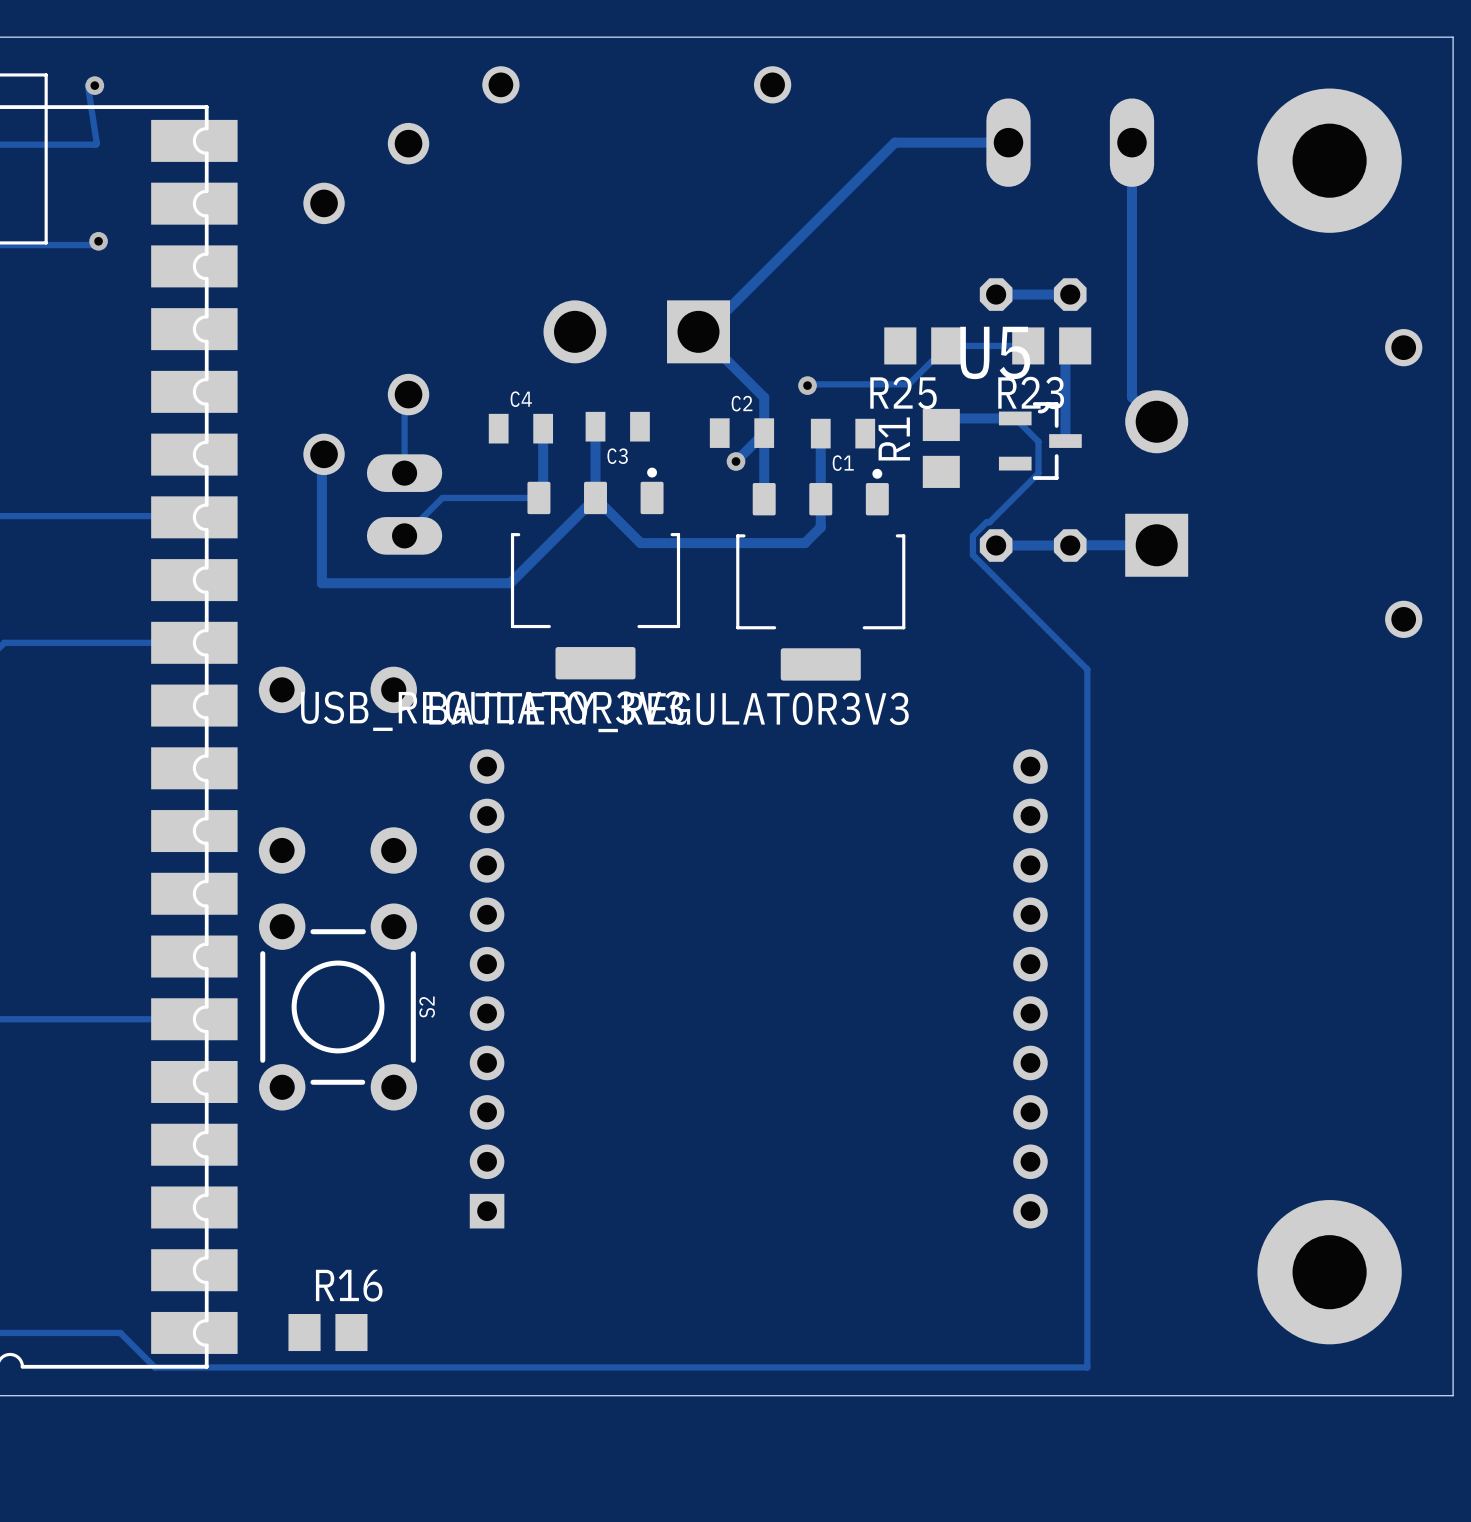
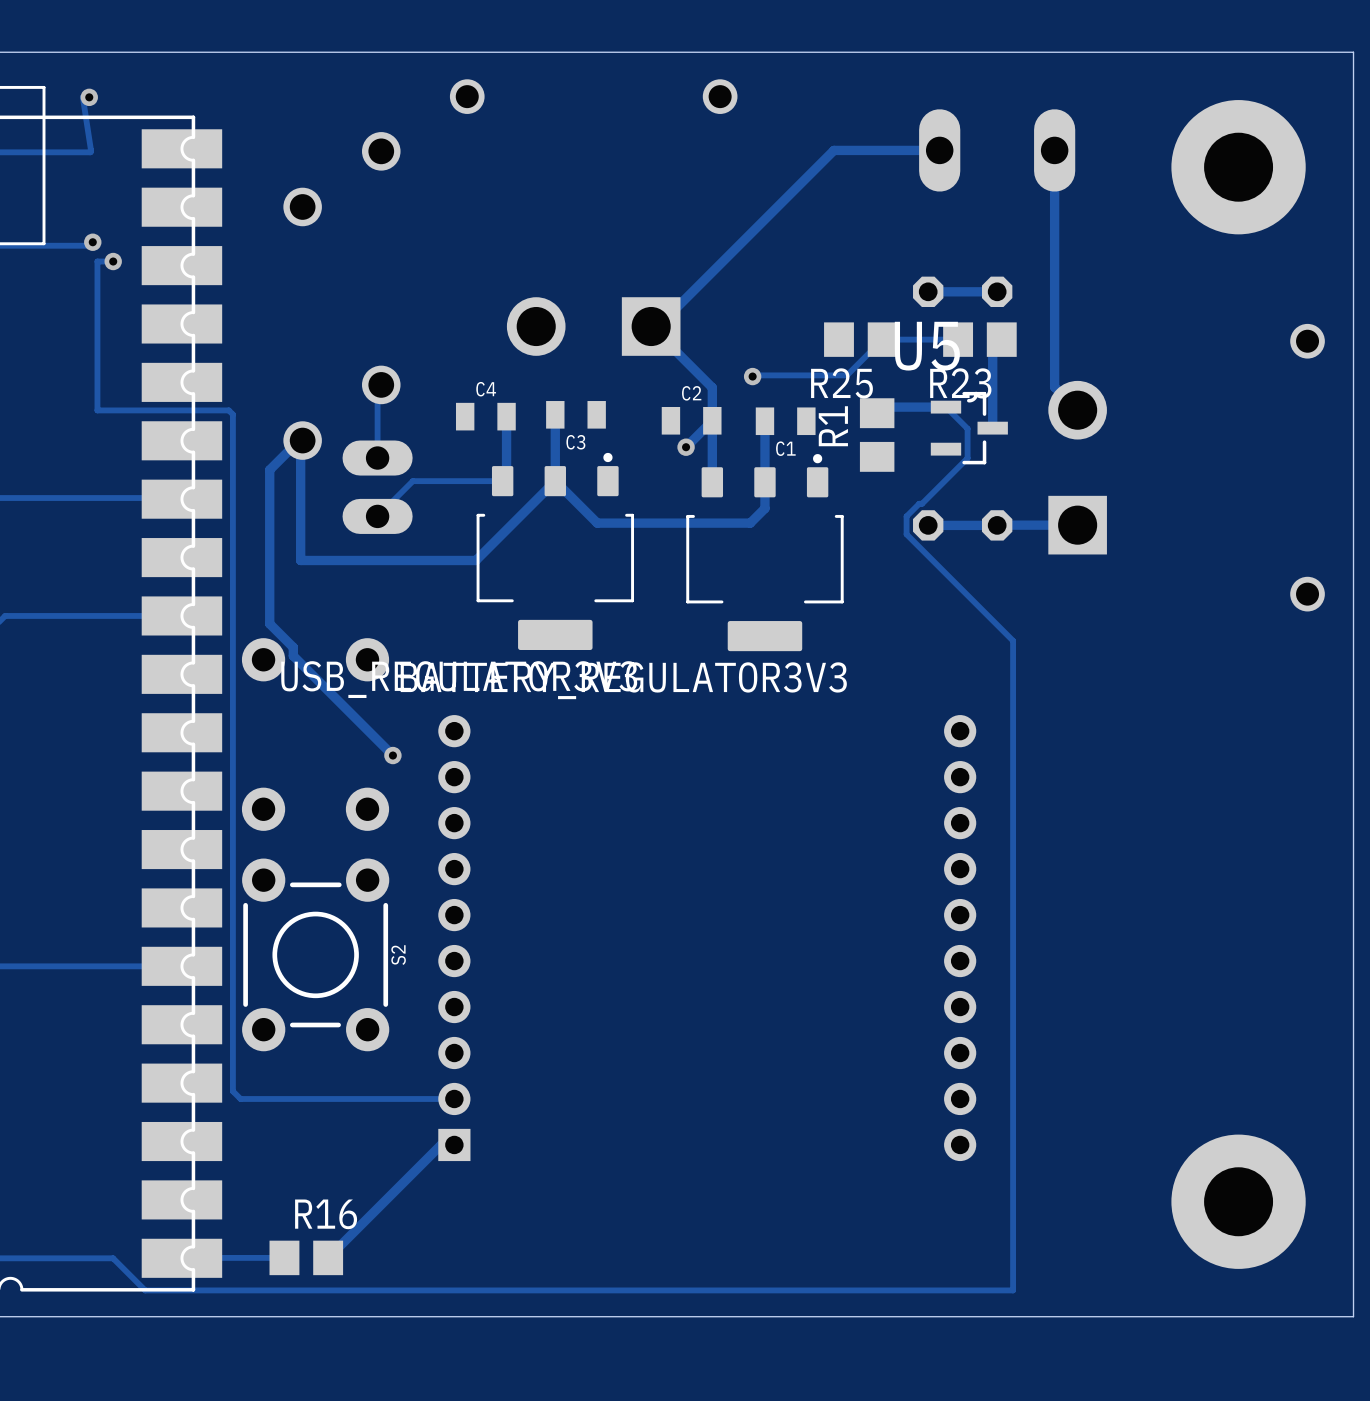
track: none -> (113, 261) (97, 261) (97, 410) (228, 410) (232, 414) (232, 1091) (240, 1098) (454, 1098)
via: none -> (113, 261)
track: none -> (300, 442) (297, 442) (269, 469) (269, 623) (293, 647) (293, 655) (392, 755)
via: none -> (392, 755)
track: none -> (454, 1144) (441, 1144) (328, 1257)
track: none -> (284, 1257) (181, 1258)

